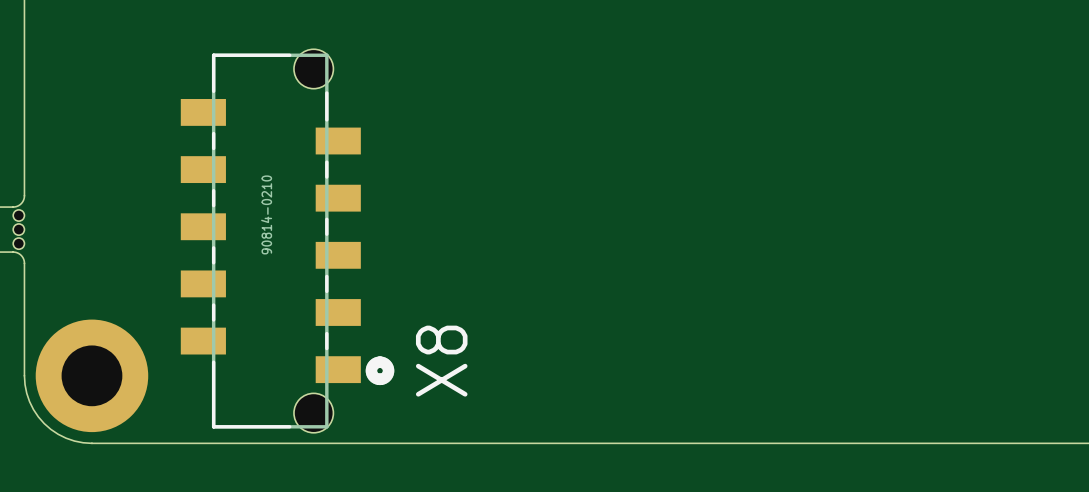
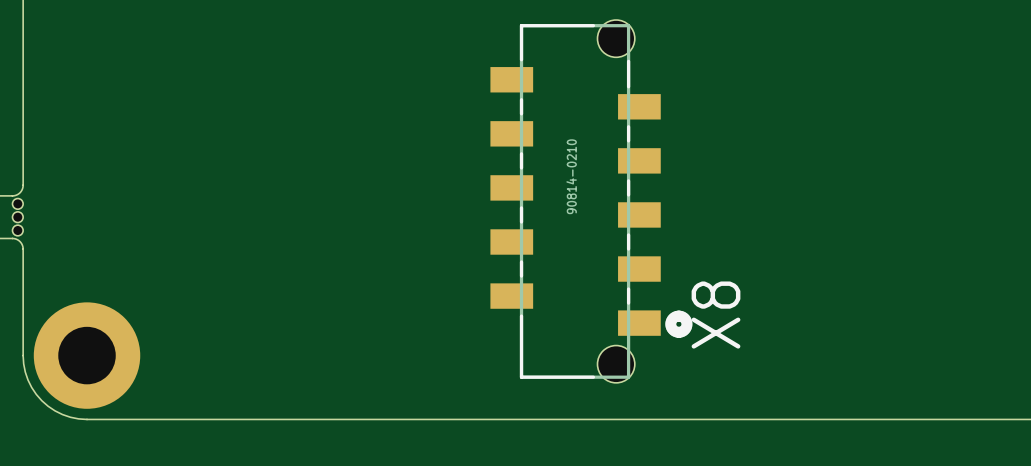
X8 position: (287, 241) -> (591, 201)
X8 name position: X8 (441, 361) -> X8 (716, 315)

